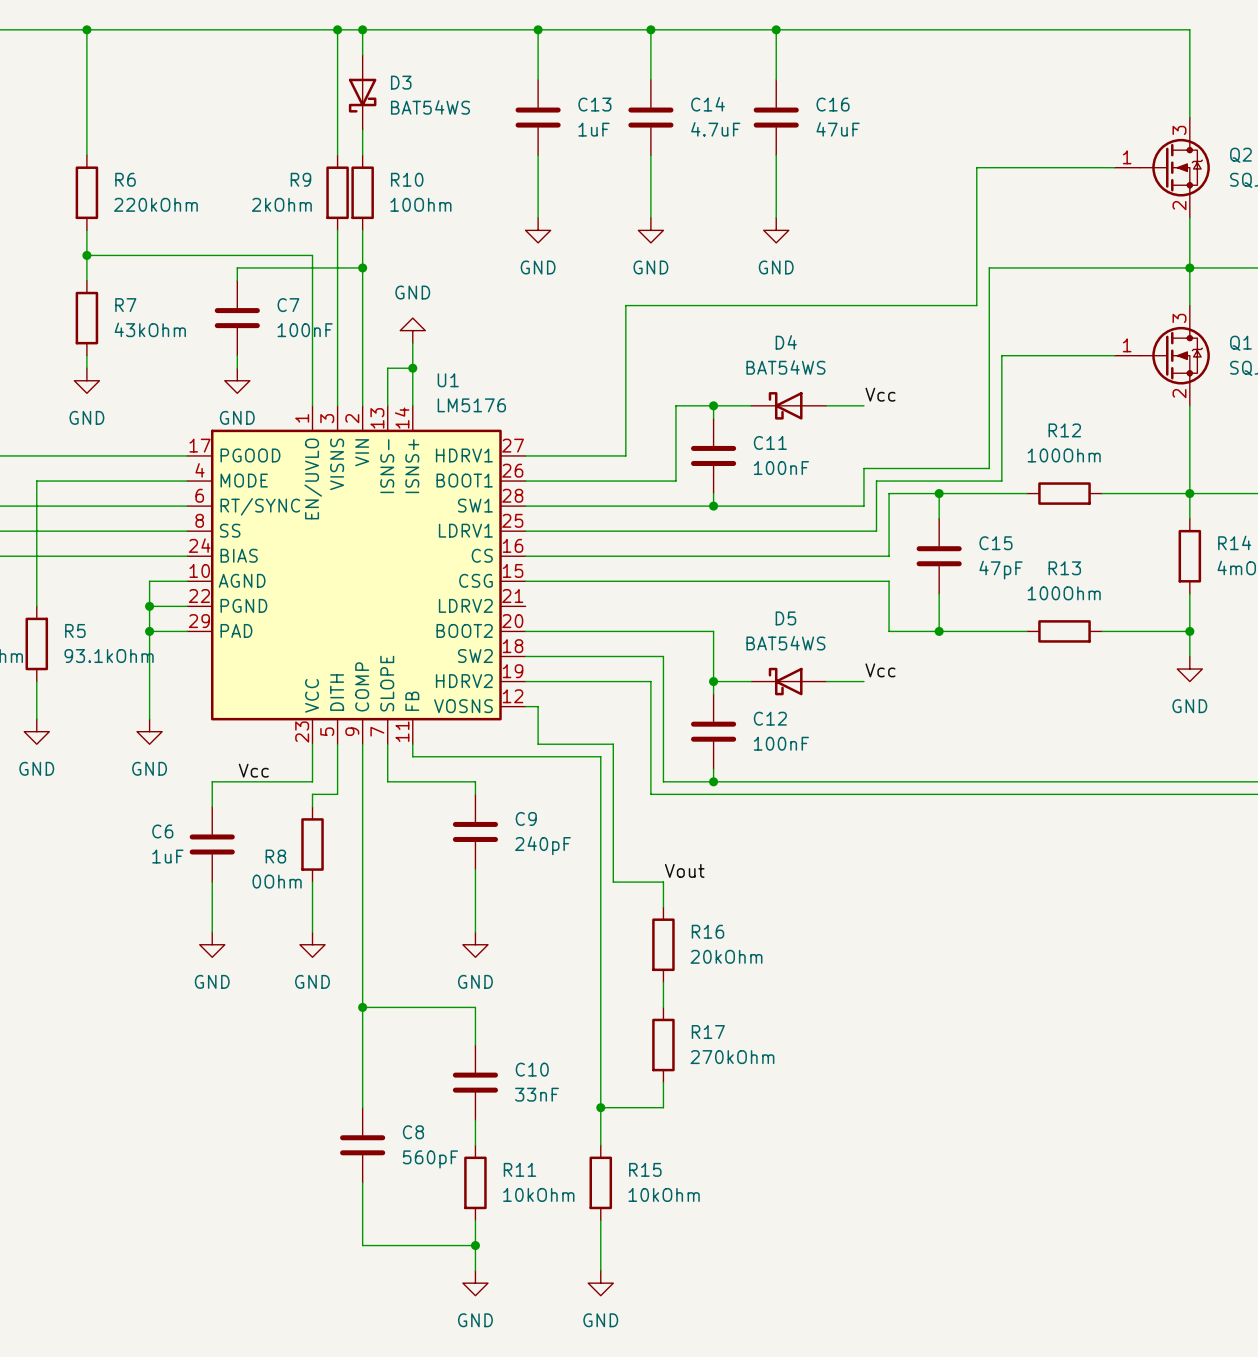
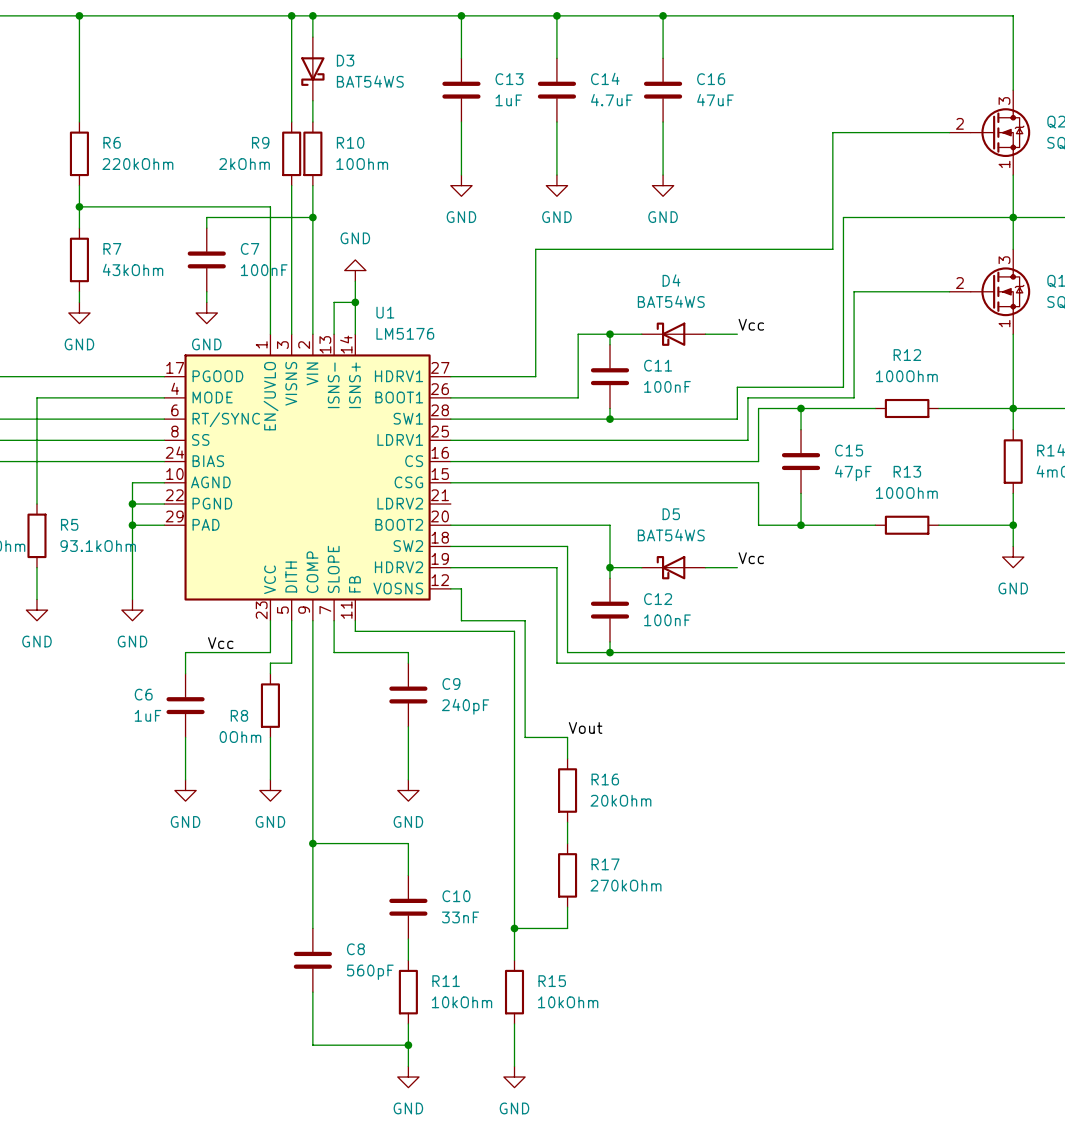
Q2 pin number: 1 (1127, 157) -> 2 (959, 123)
Q2 pin number: 2 (1179, 205) -> 1 (1004, 164)
Q1 pin number: 1 (1127, 345) -> 2 (959, 283)
Q1 pin number: 2 (1179, 393) -> 1 (1004, 323)

